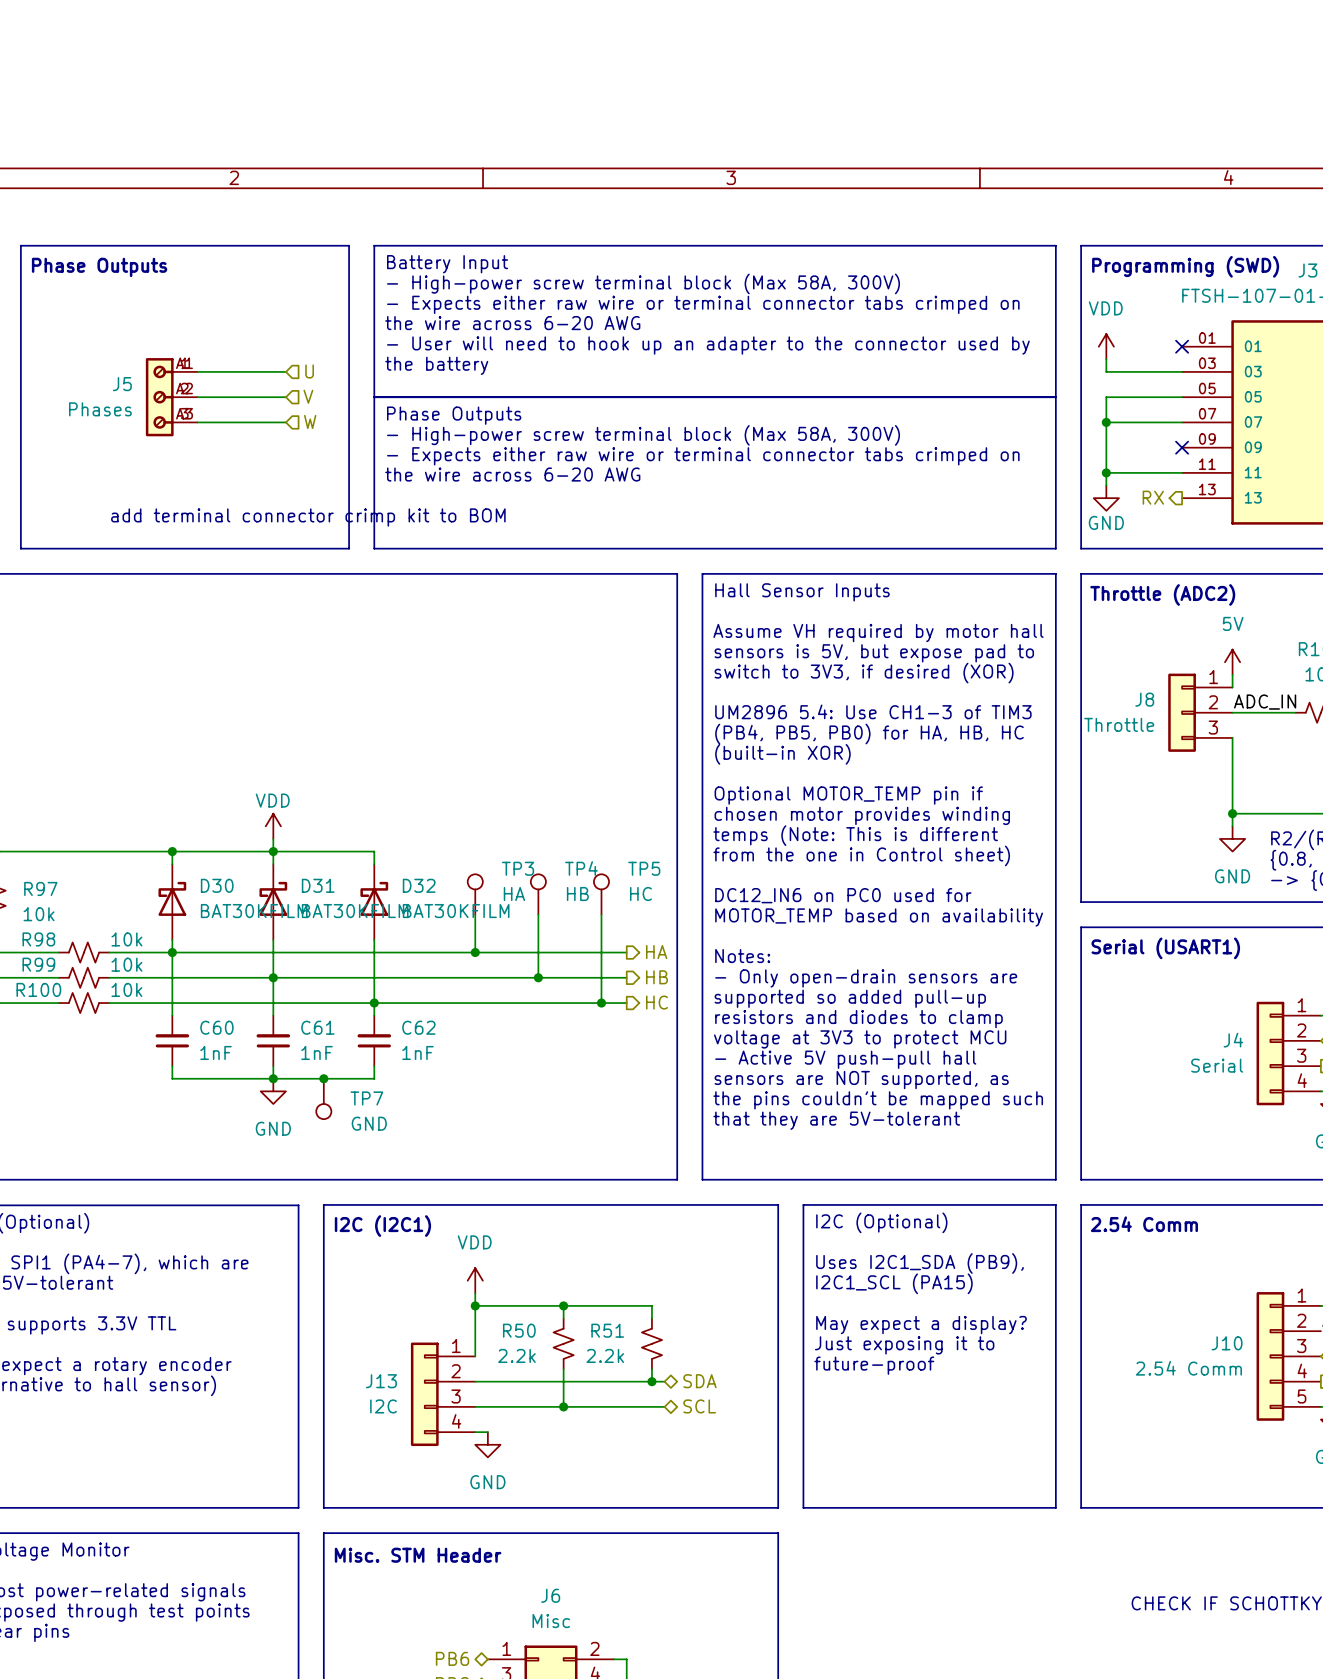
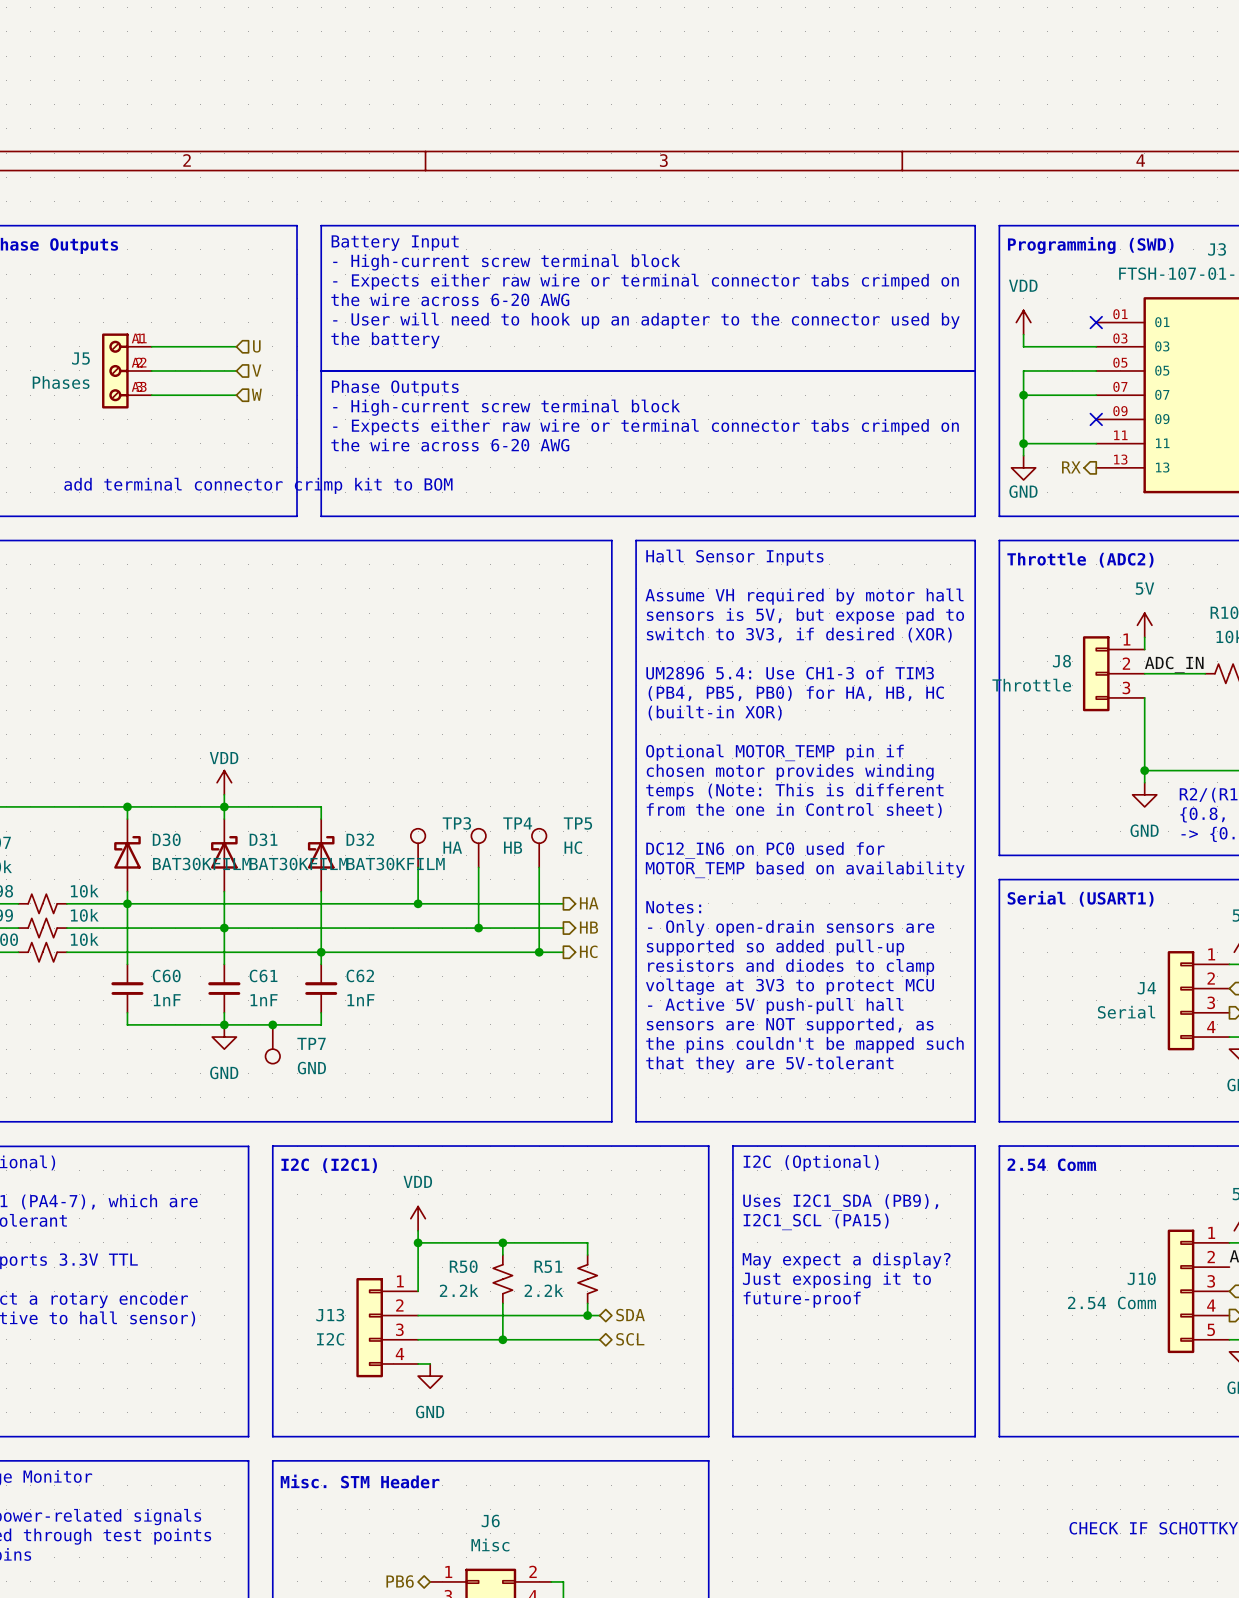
text: - High-power screw terminal block (Max 58A, 300V) (643, 283) -> - High-current screw terminal block (506, 262)
text: - High-power screw terminal block (Max 58A, 300V) (643, 435) -> - High-current screw terminal block (506, 407)

